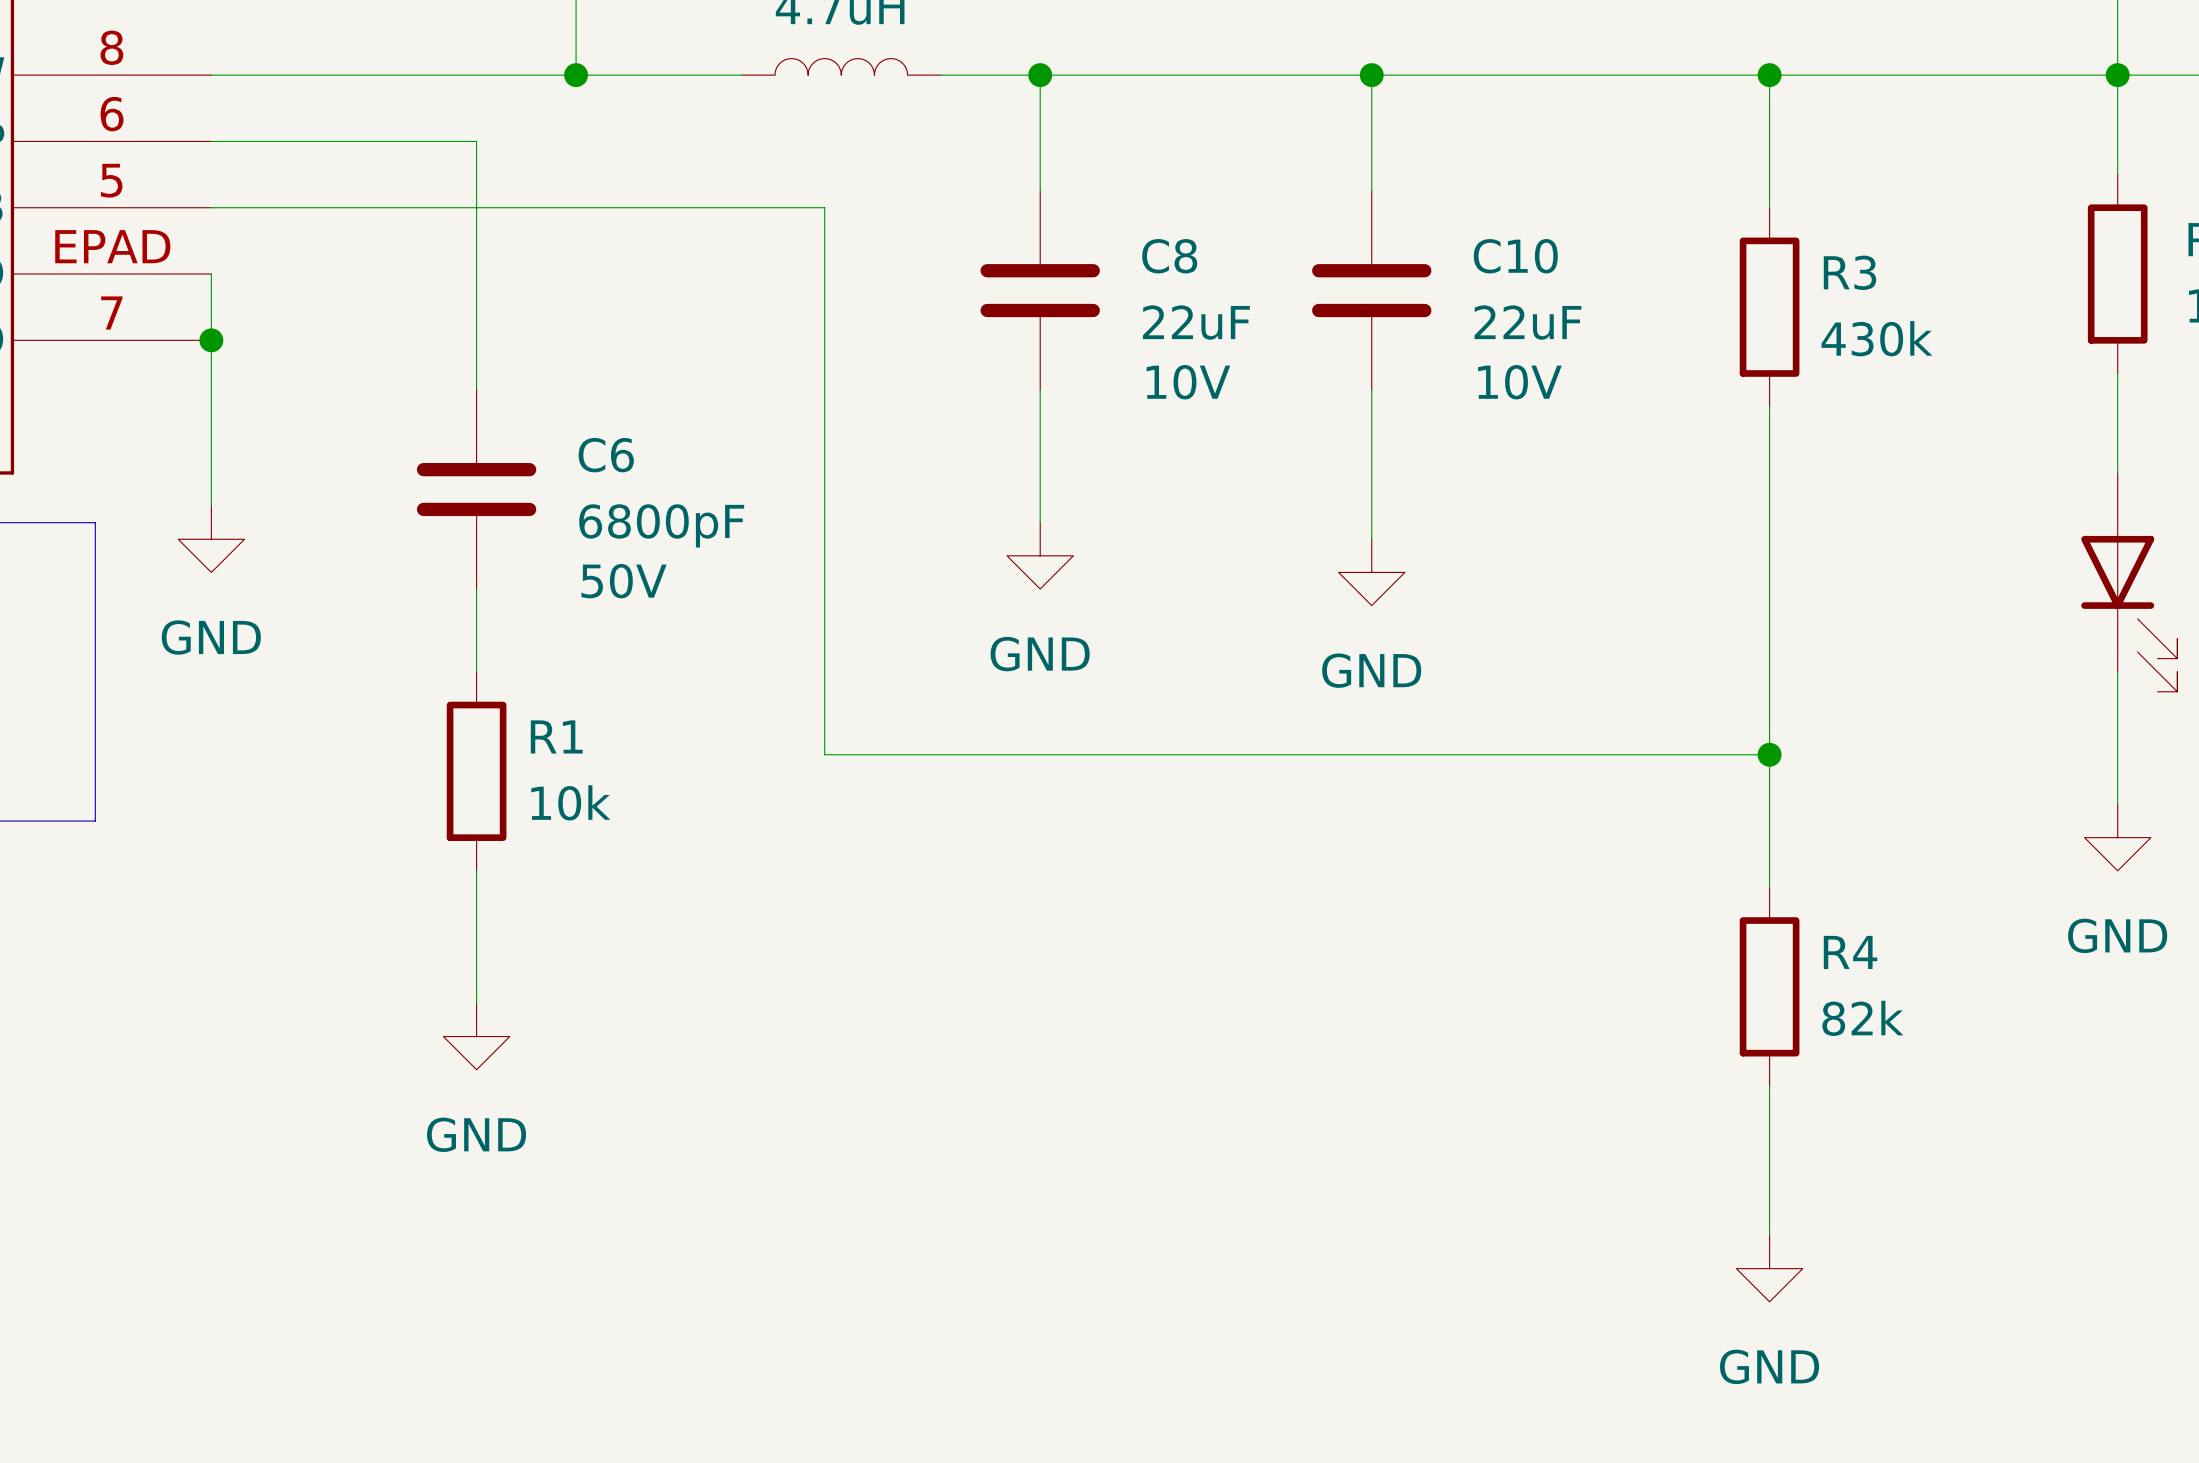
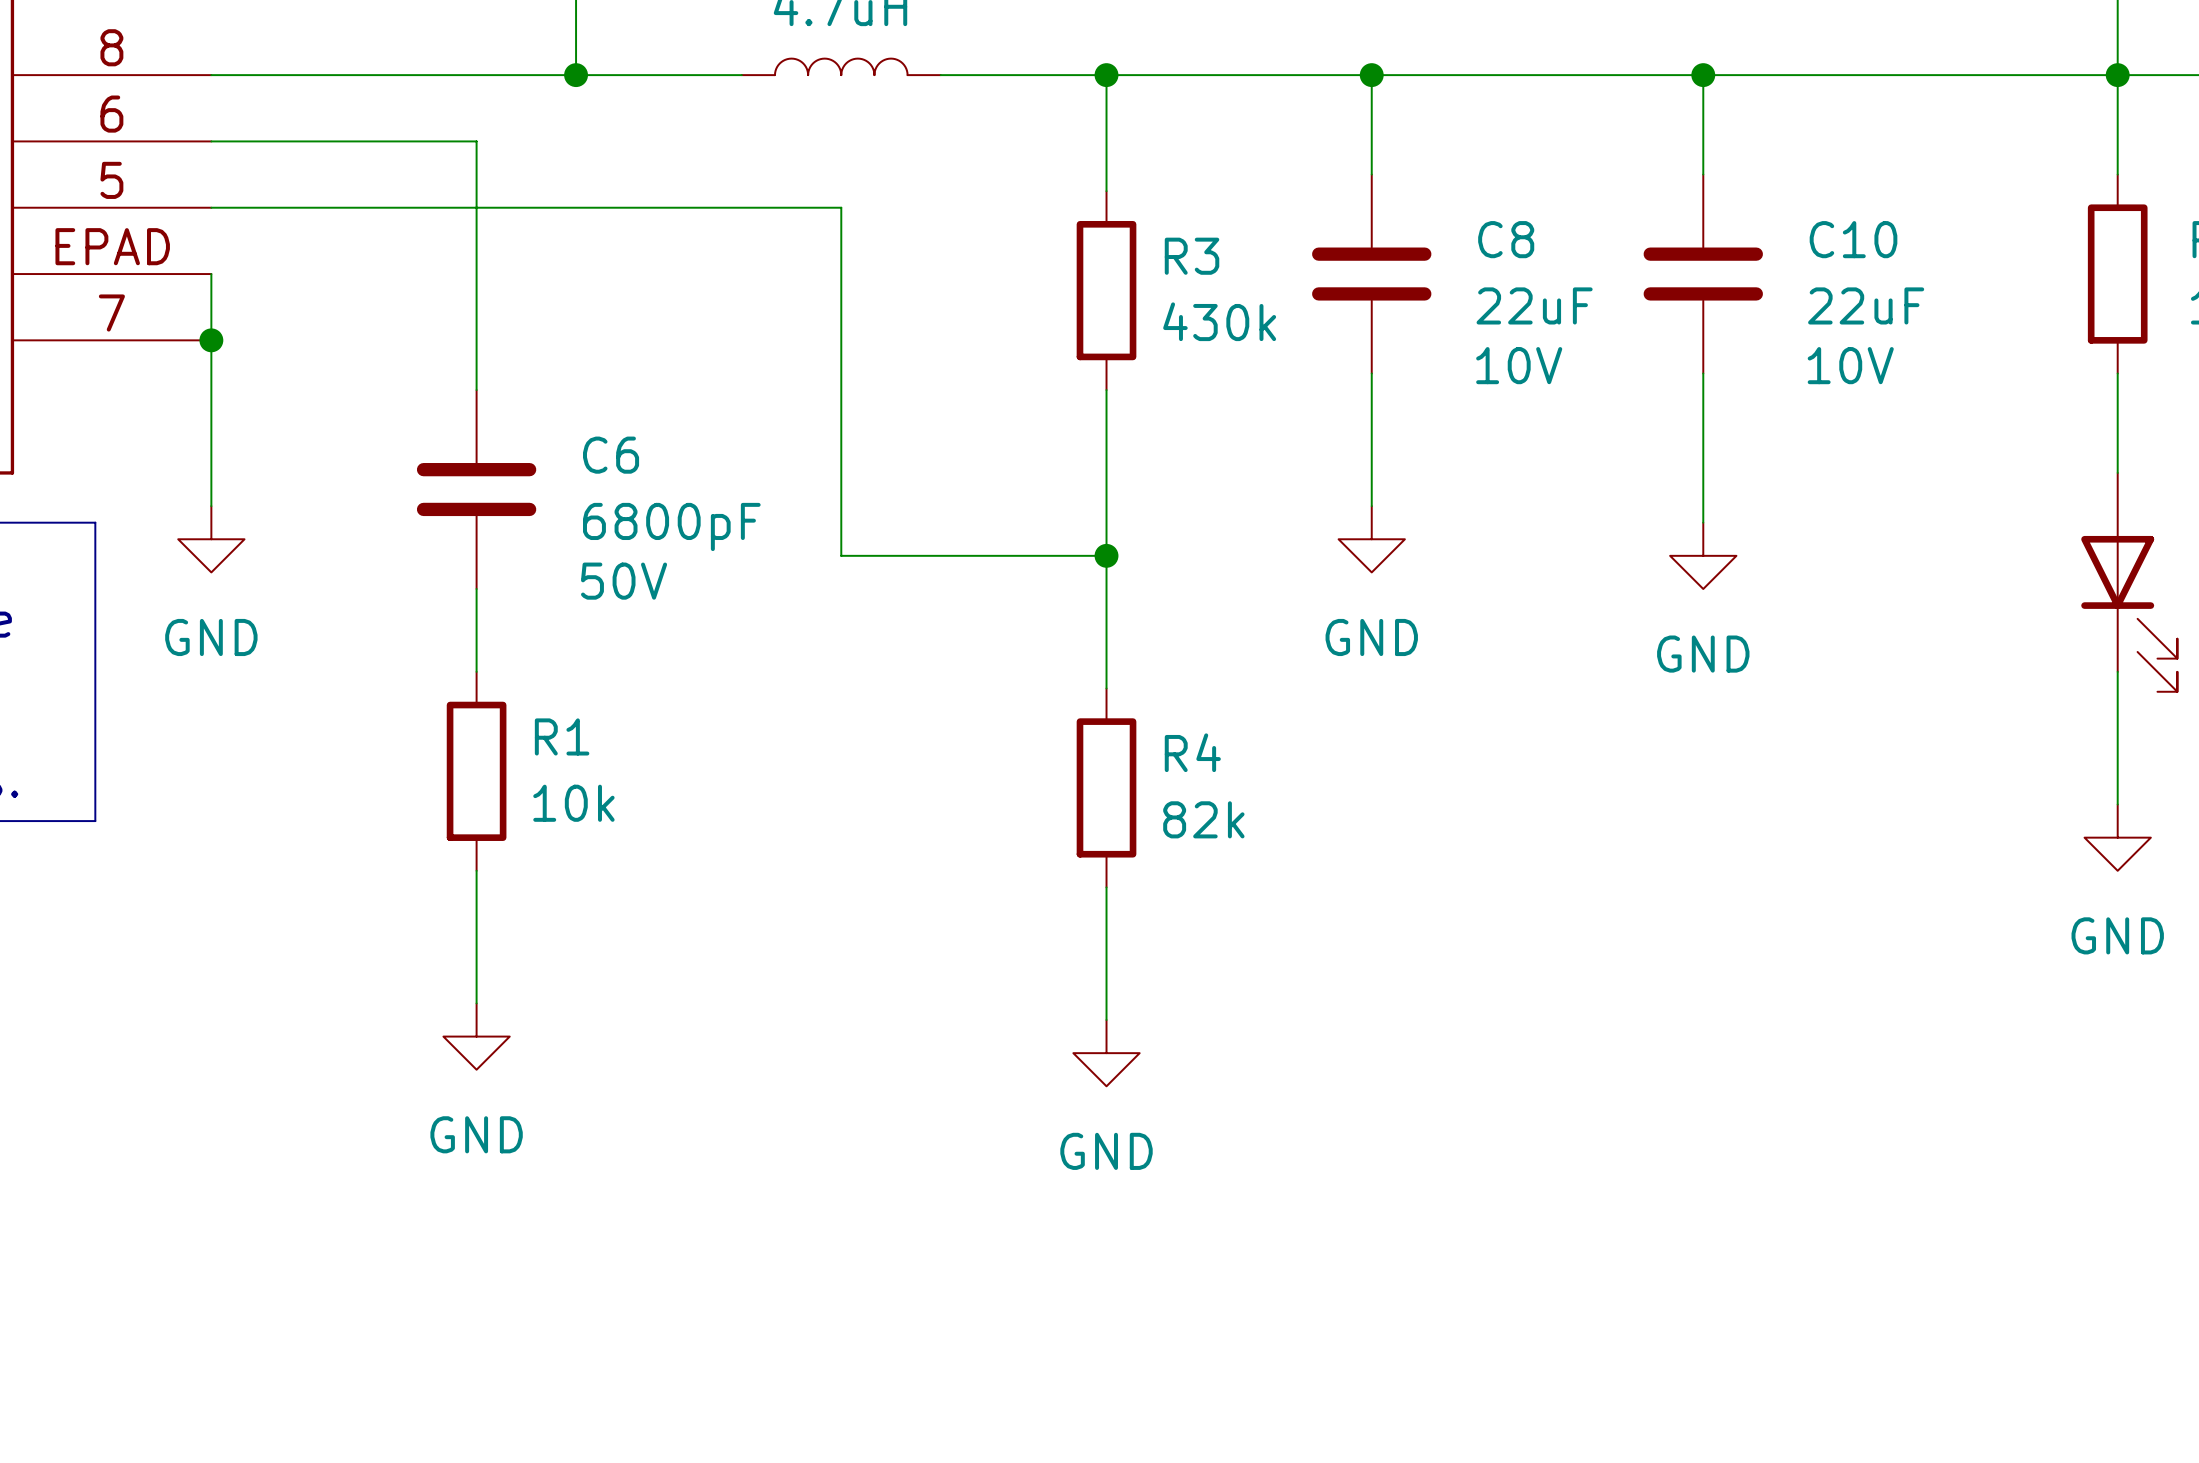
wire: (1040, 75) (1040, 191) -> (1106, 75) (1106, 191)
junction position: (1040, 75) -> (1106, 75)
wire: none -> (1703, 75) (1703, 174)
wire: (1769, 75) (1769, 207) -> none
junction position: (1769, 75) -> (1703, 75)
wire: (824, 207) (824, 754) (1769, 754) -> (824, 207) (841, 207) (841, 555) (1106, 555)
C8 position: (1040, 290) -> (1371, 274)
C10 position: (1371, 290) -> (1703, 274)
R3 position: (1769, 307) -> (1106, 290)
wire: none -> (1703, 373) (1703, 522)
wire: (1040, 390) (1040, 522) -> (1106, 887) (1106, 1019)
wire: none -> (1106, 390) (1106, 688)
wire: (1769, 406) (1769, 887) -> none
power symbol: GND (1040, 555) -> none
junction: none -> (1106, 555)
power symbol: none -> GND (1703, 555)
power symbol position: GND (1371, 572) -> GND (1371, 539)
junction: (1769, 754) -> none
R4 position: (1769, 986) -> (1106, 787)
power symbol: none -> GND (1106, 1053)
wire: (1769, 1086) (1769, 1235) -> none
power symbol: GND (1769, 1268) -> none

